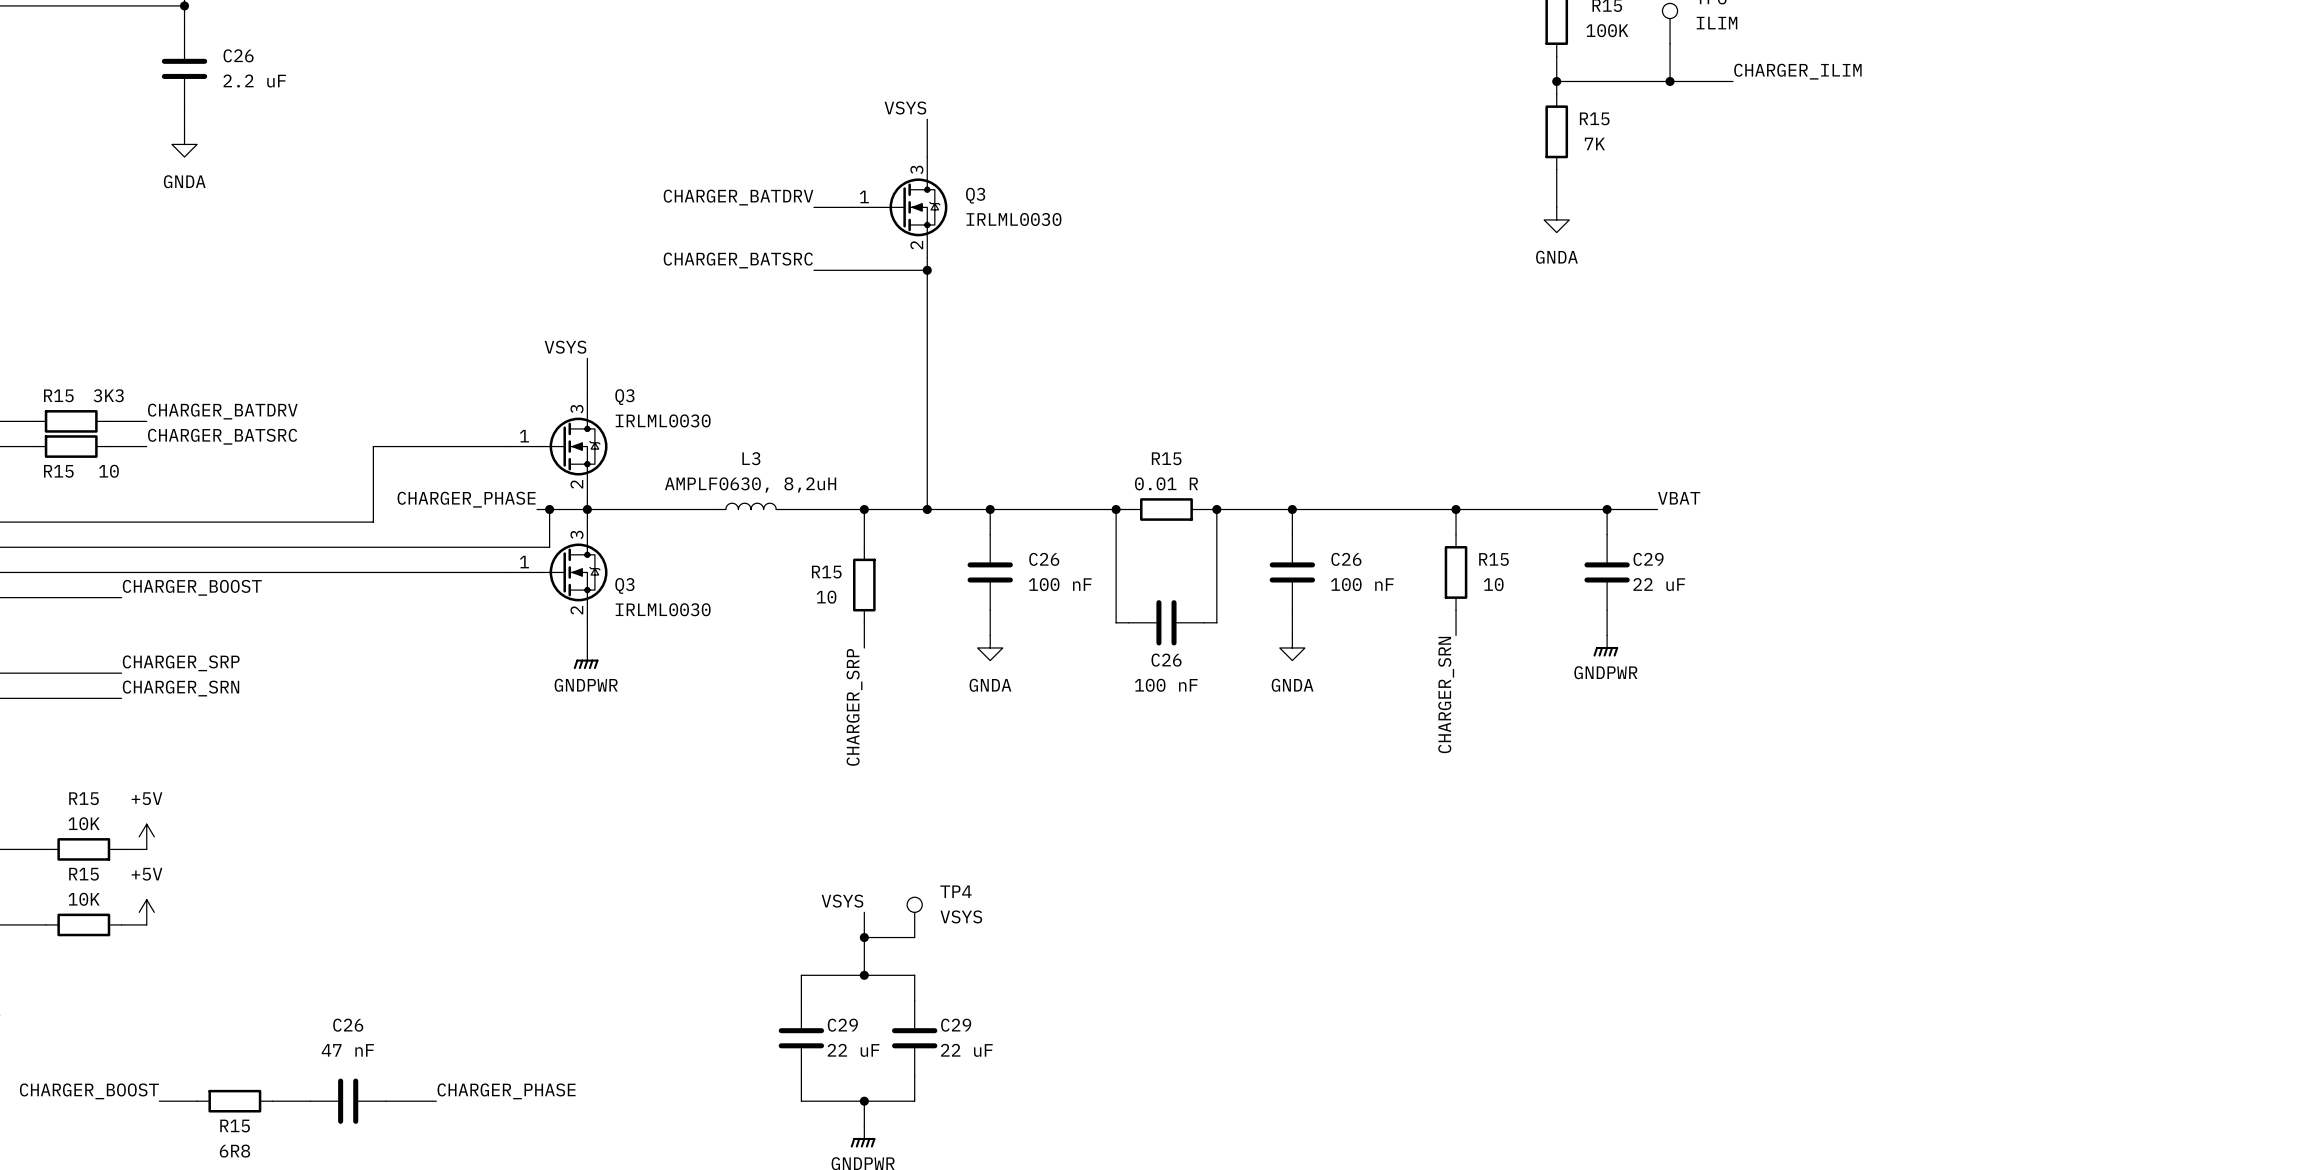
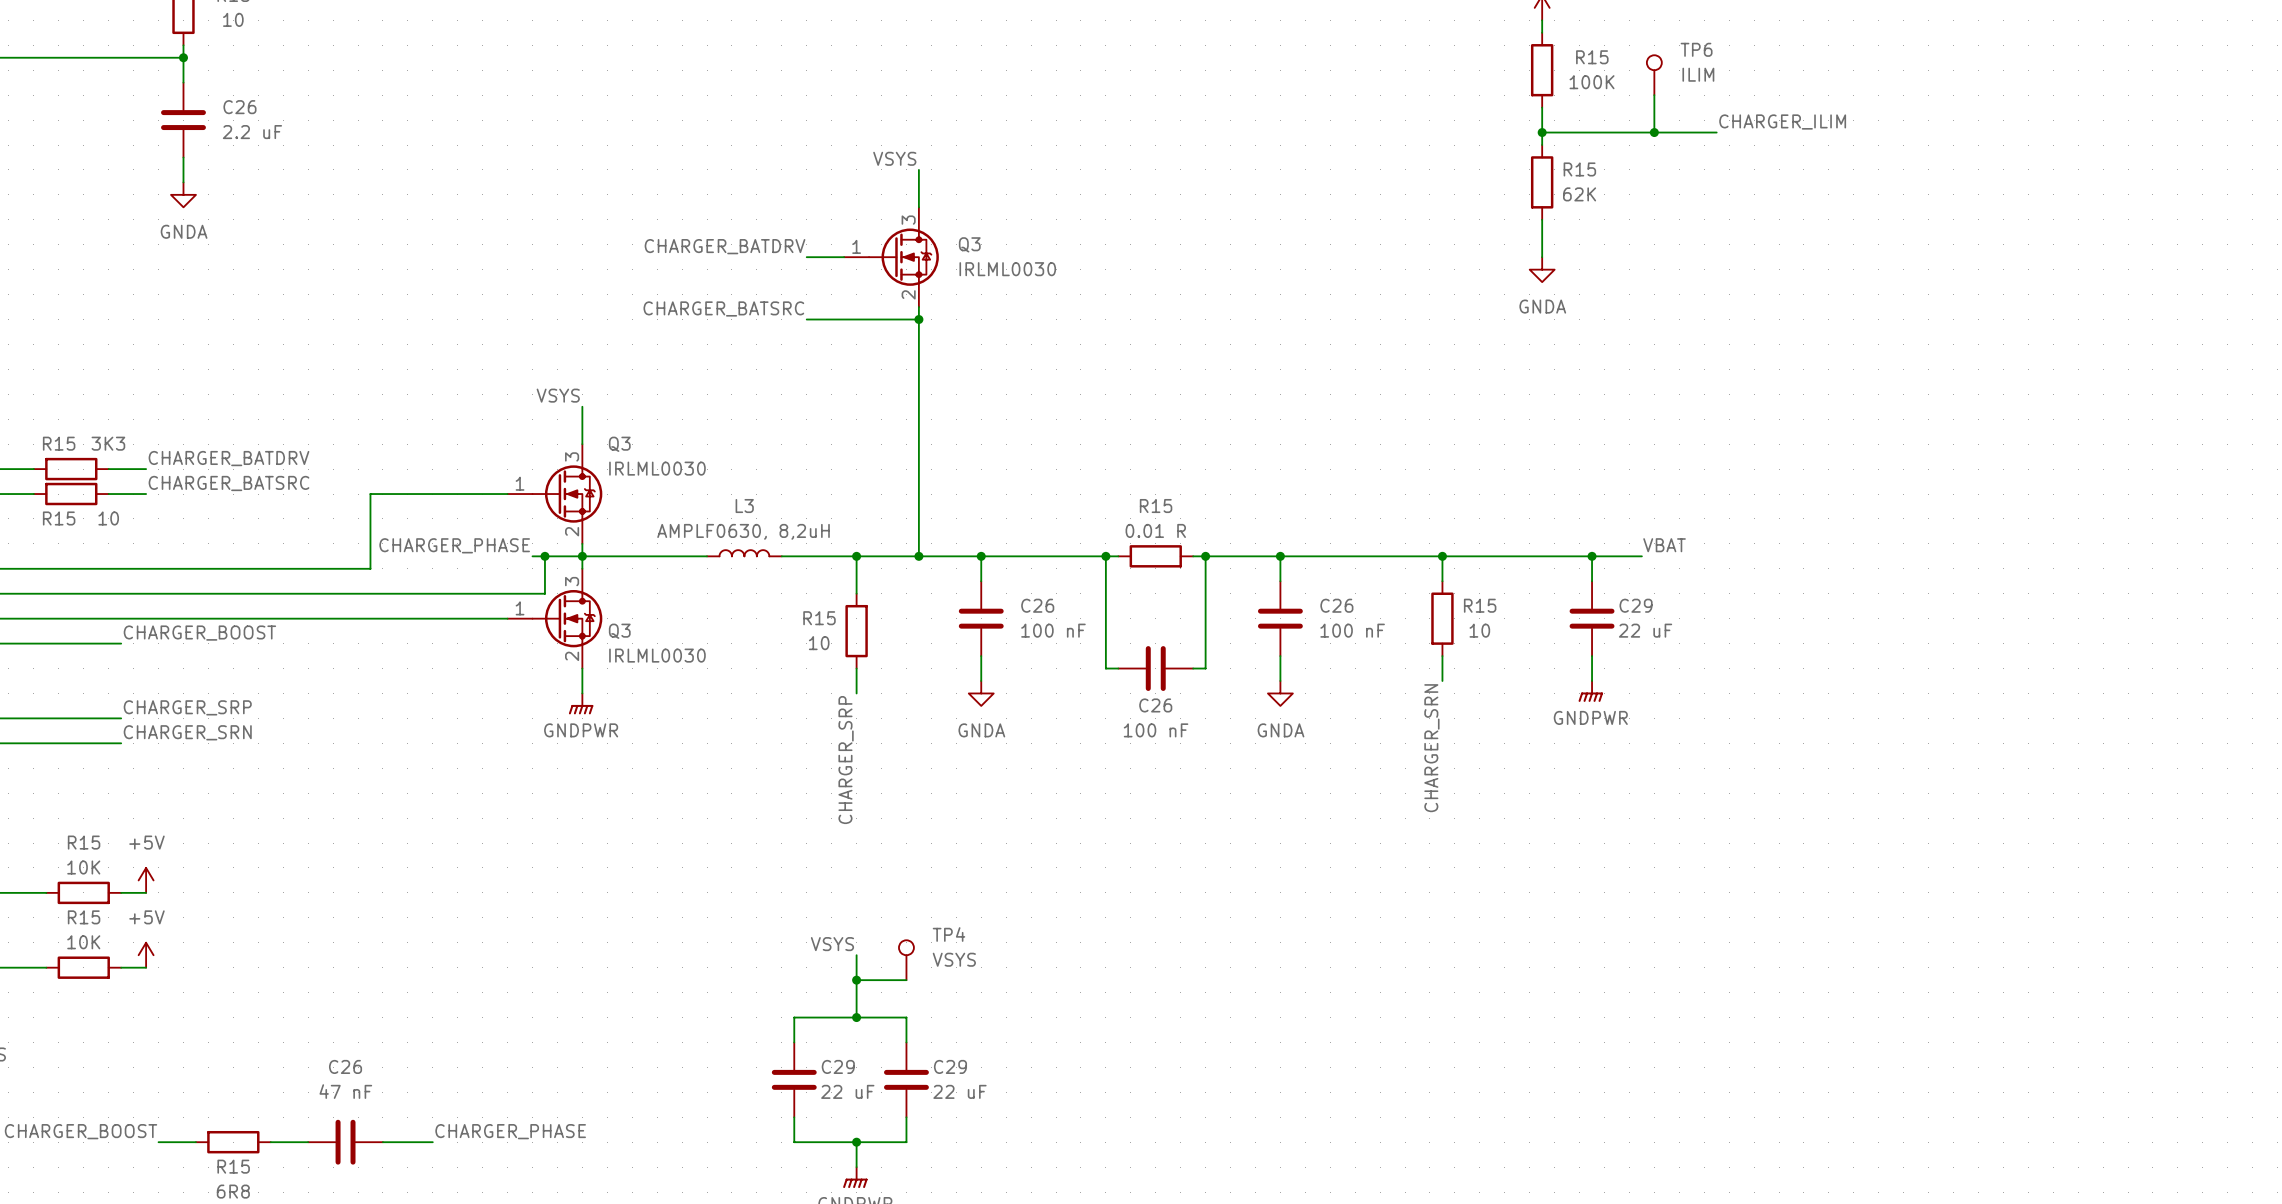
R15 value: 7K (1594, 143) -> 62K (1579, 194)

